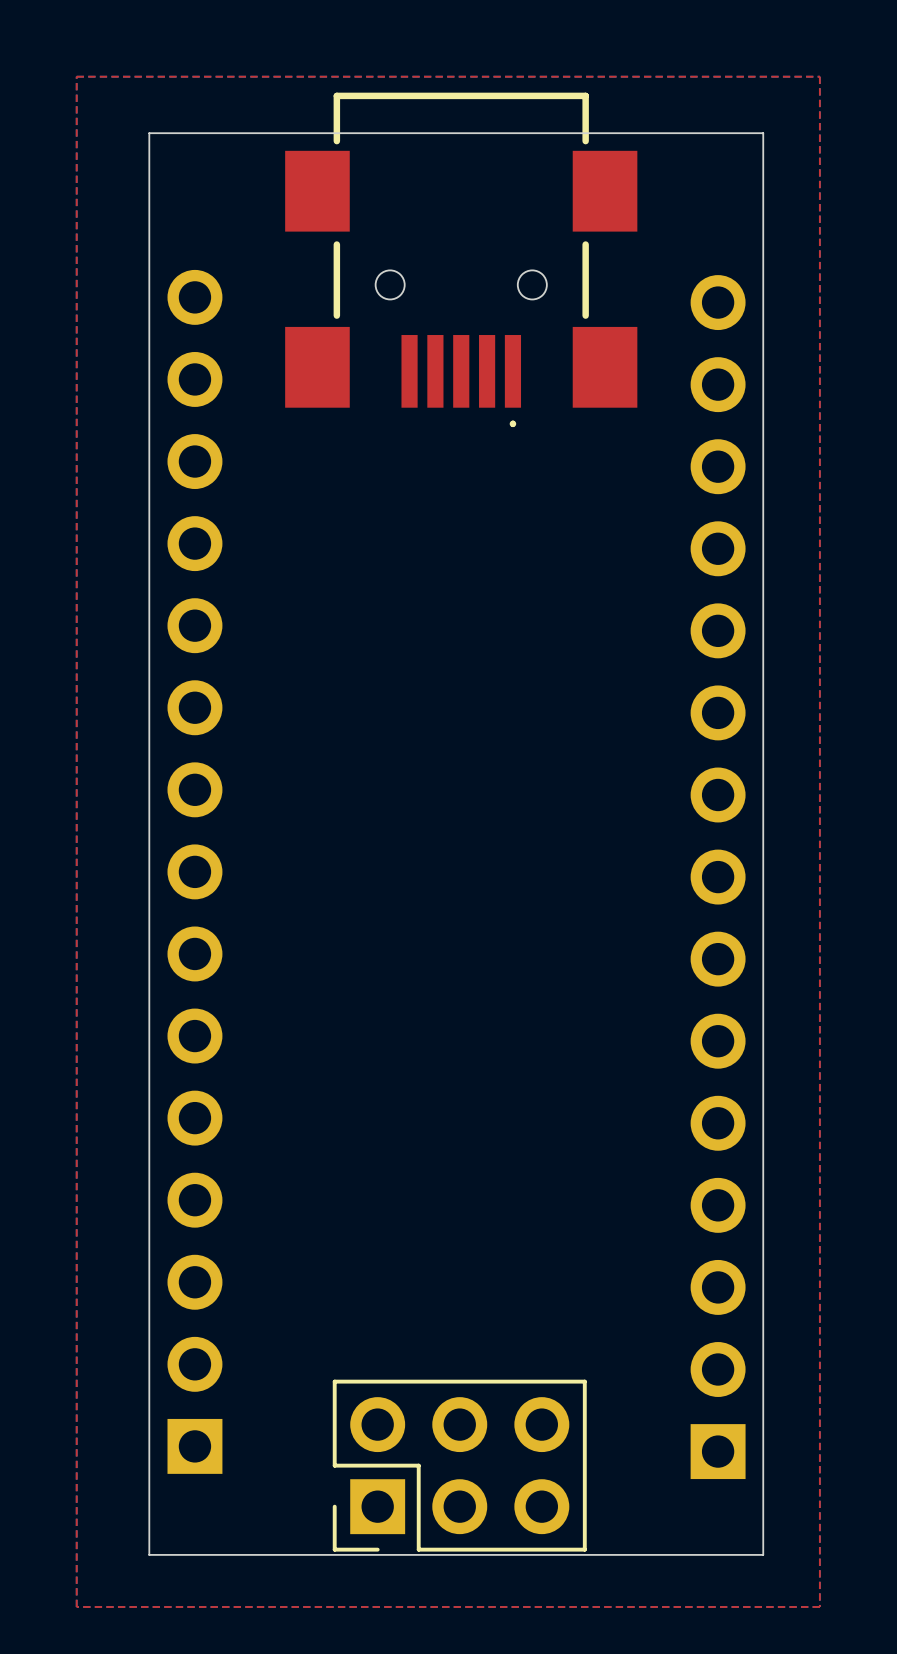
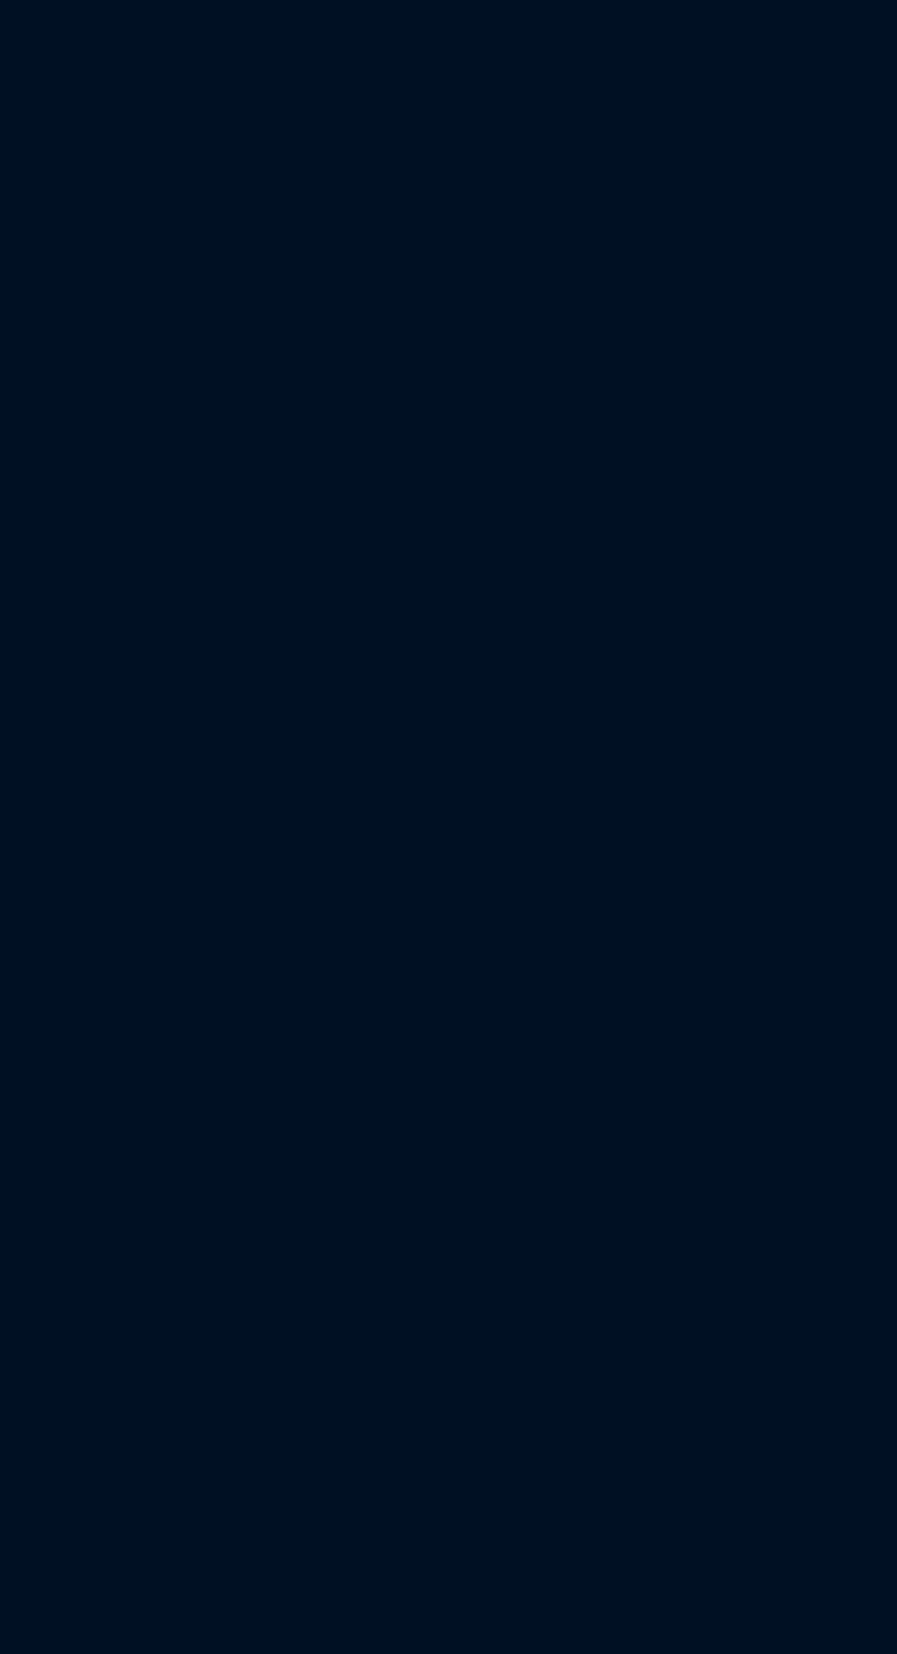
top zone outline: (76, 76) (819, 76) (819, 1607) (76, 1607) (76, 76) -> none
board edge: (149, 133) (763, 133) (763, 1554) (149, 1554) (149, 133) -> none
part: (461, 259) -> none
part: (194, 871) -> none
part: (718, 877) -> none
part: (459, 1465) -> none

